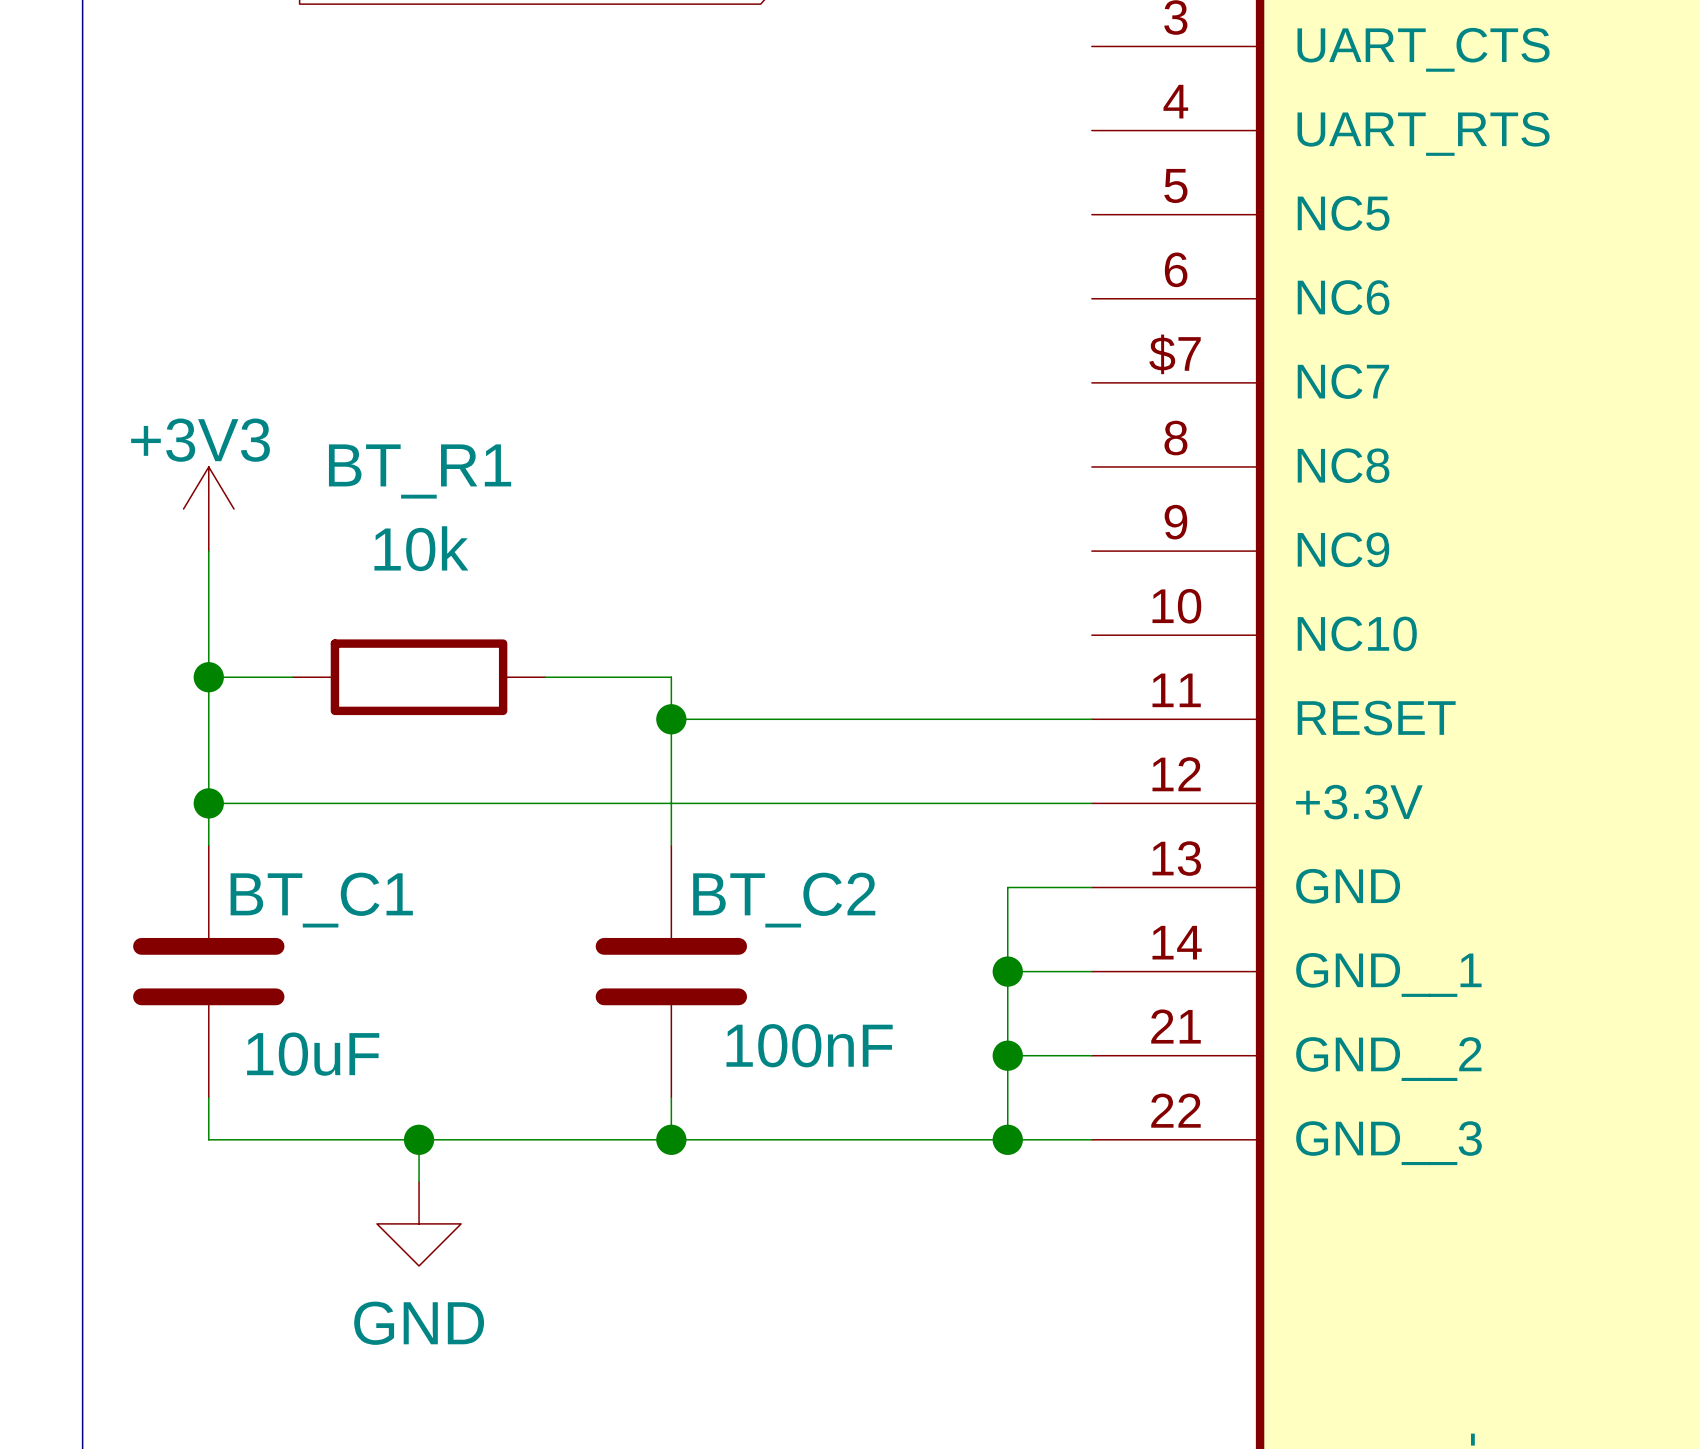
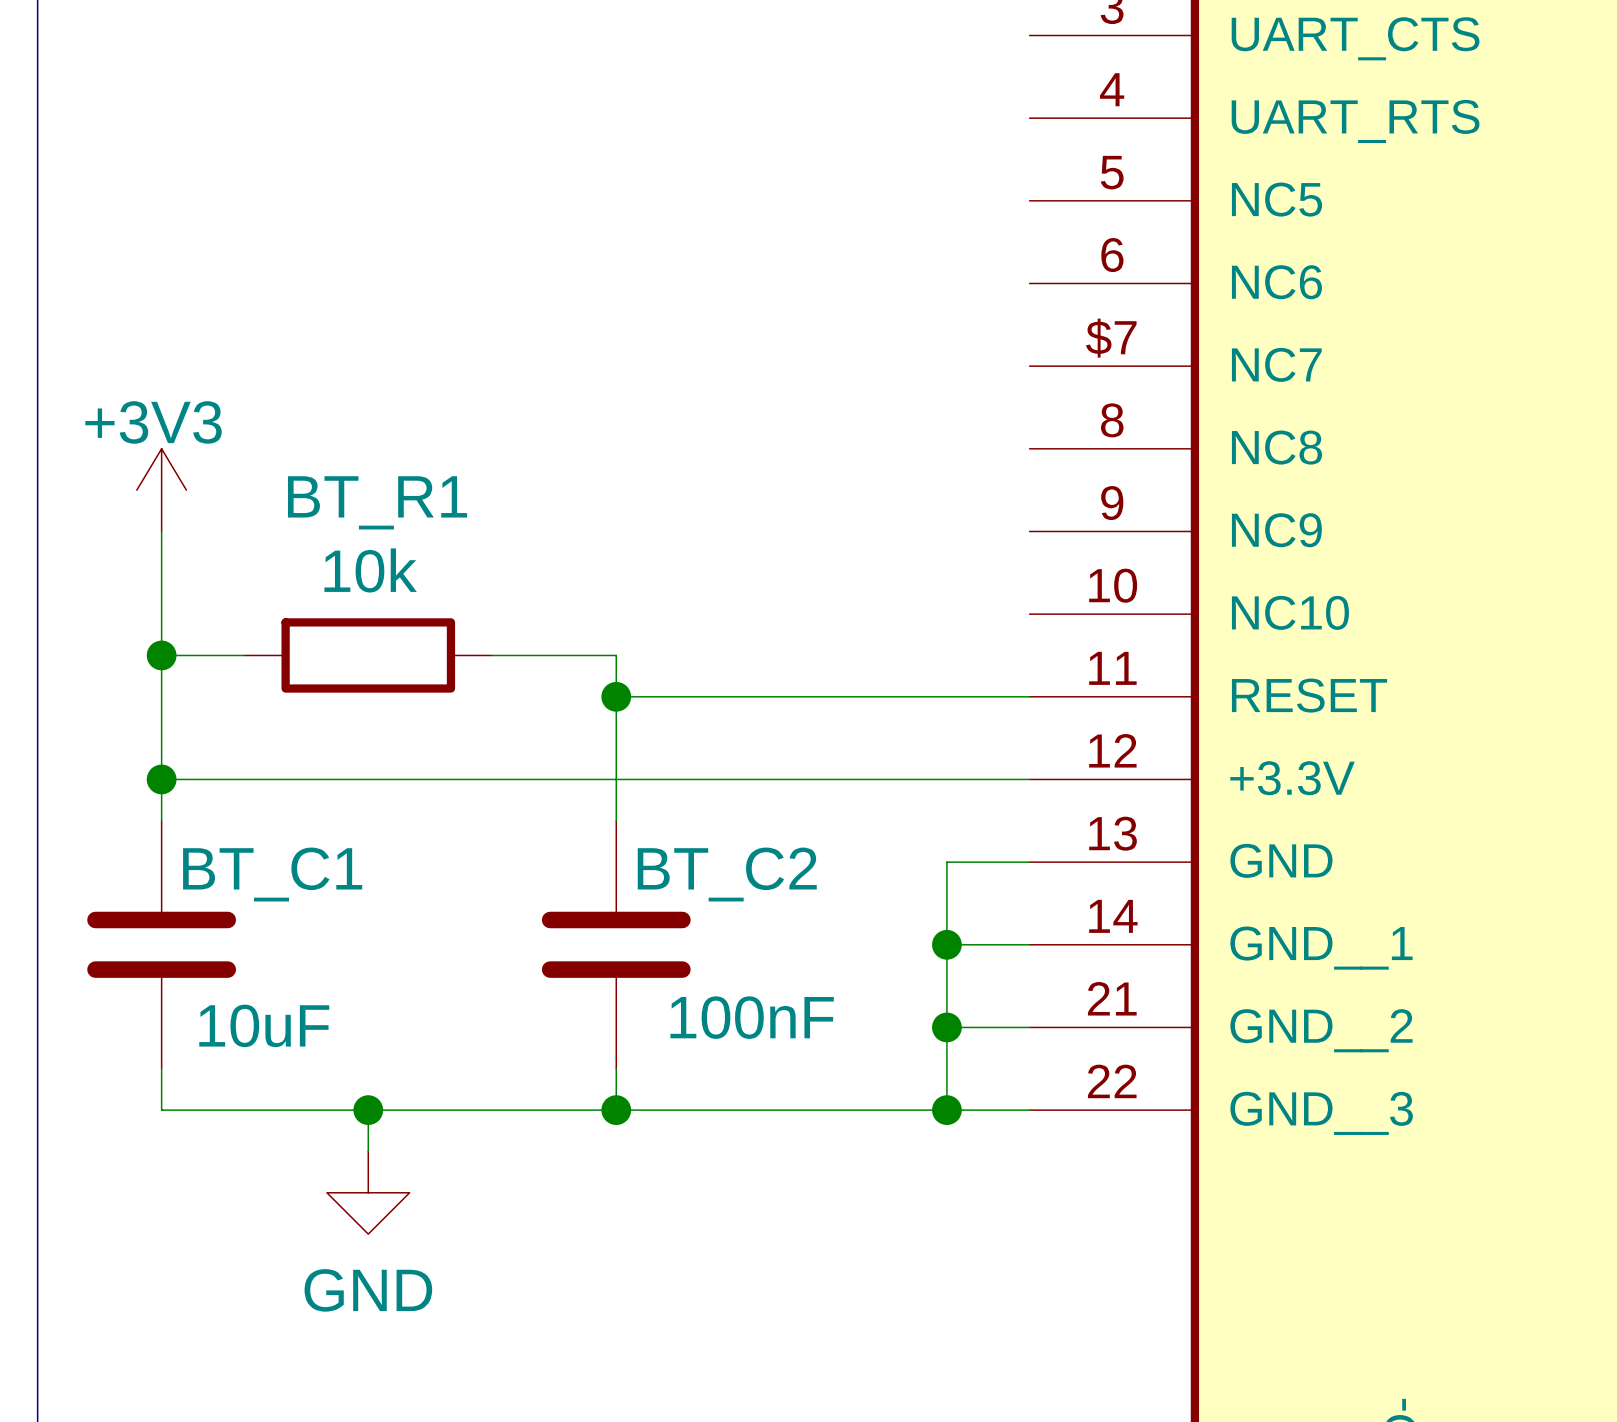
BT_R1 name position: BT_R1 (420, 471) -> BT_R1 (377, 502)
BT_R1 value position: 10k (421, 548) -> 10k (370, 570)

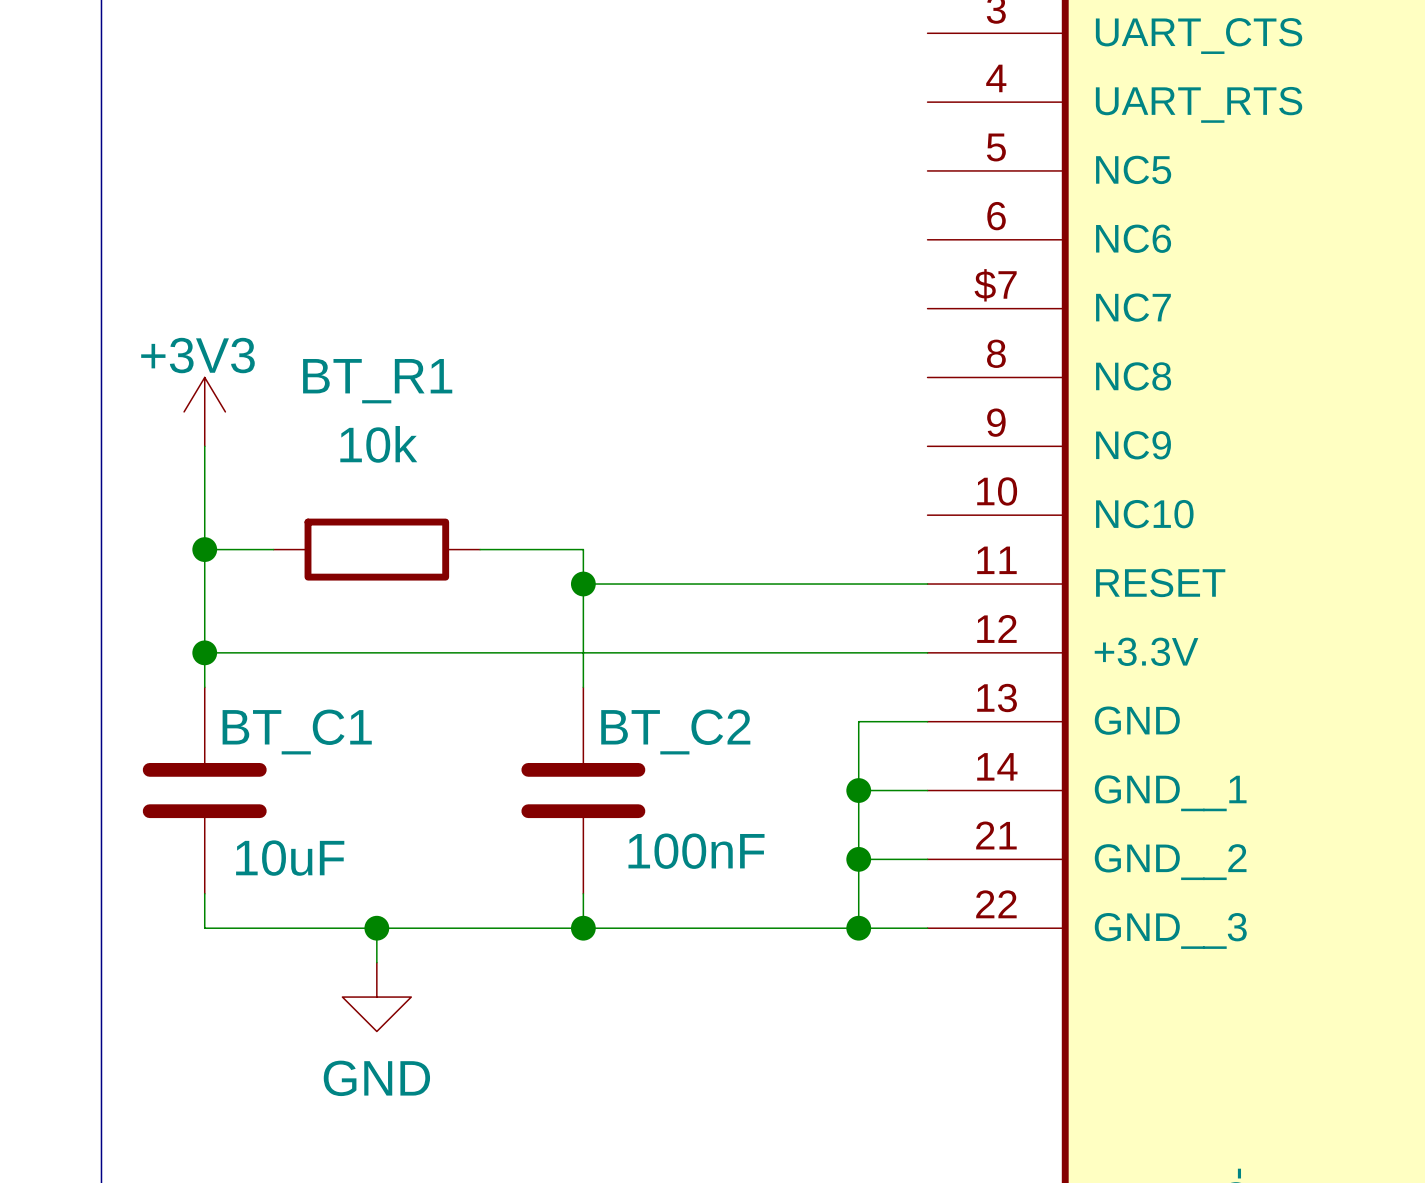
BT_R1 name position: BT_R1 (377, 502) -> BT_R1 (377, 381)
BT_R1 value position: 10k (370, 570) -> 10k (378, 444)

